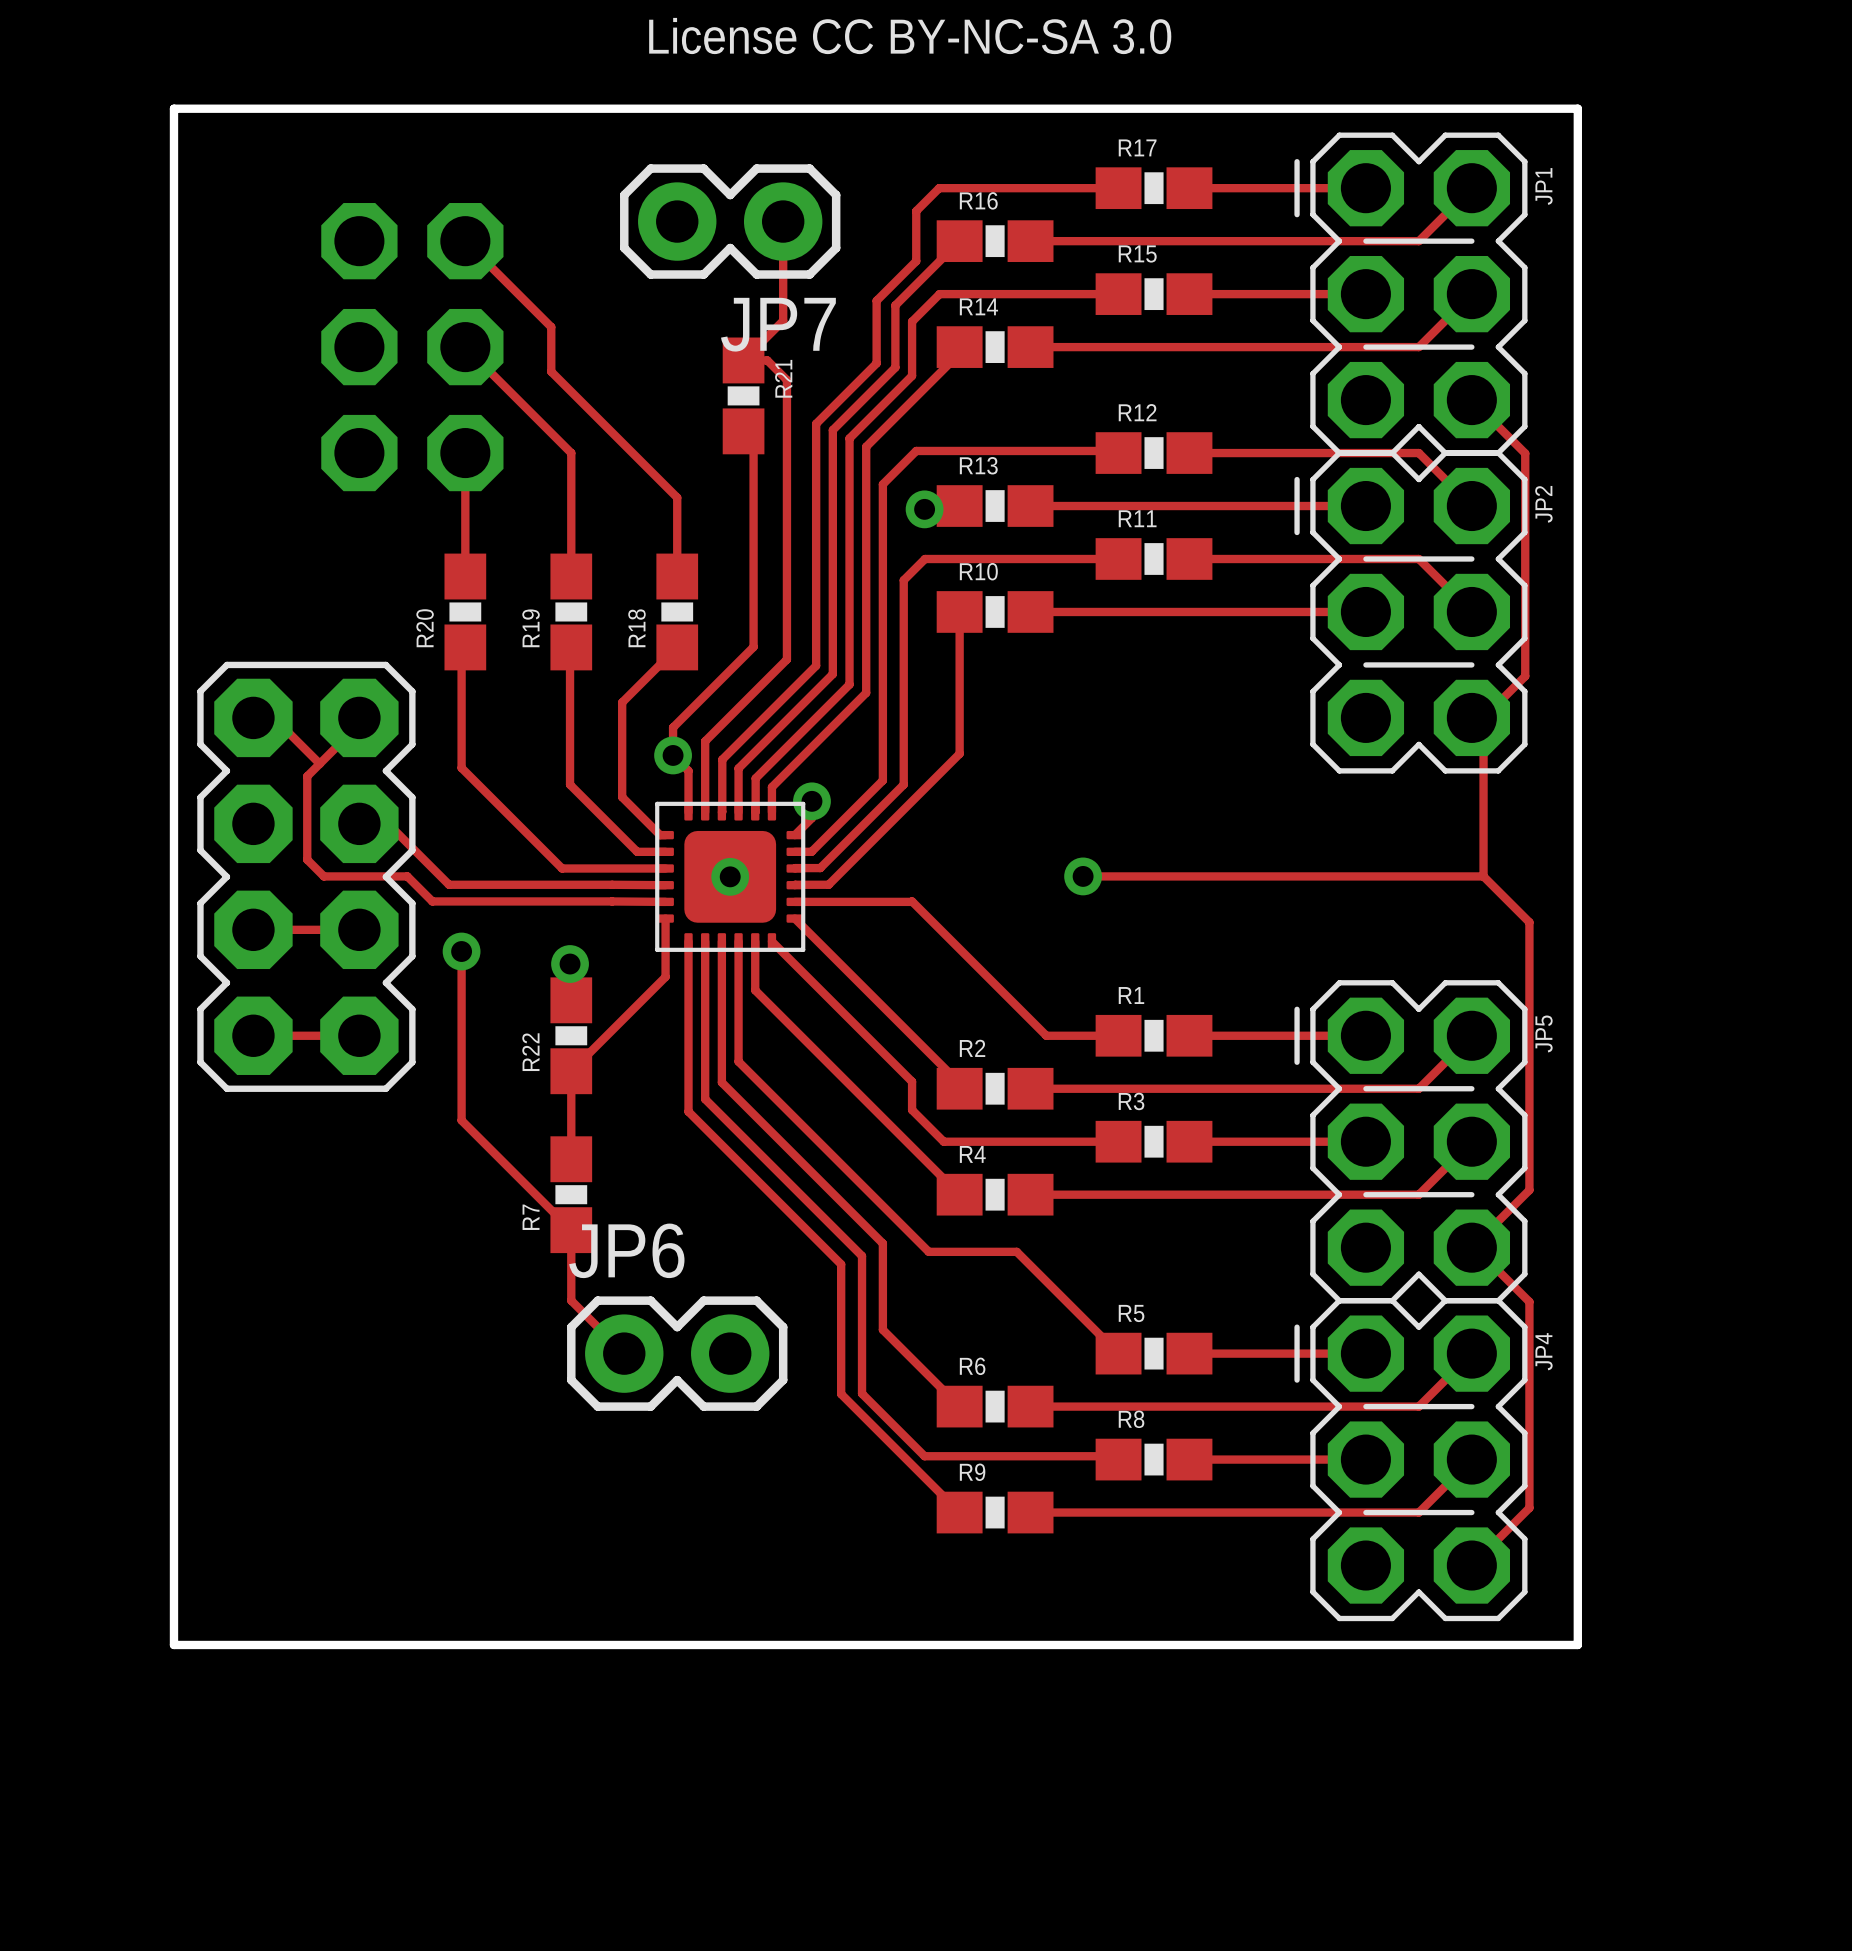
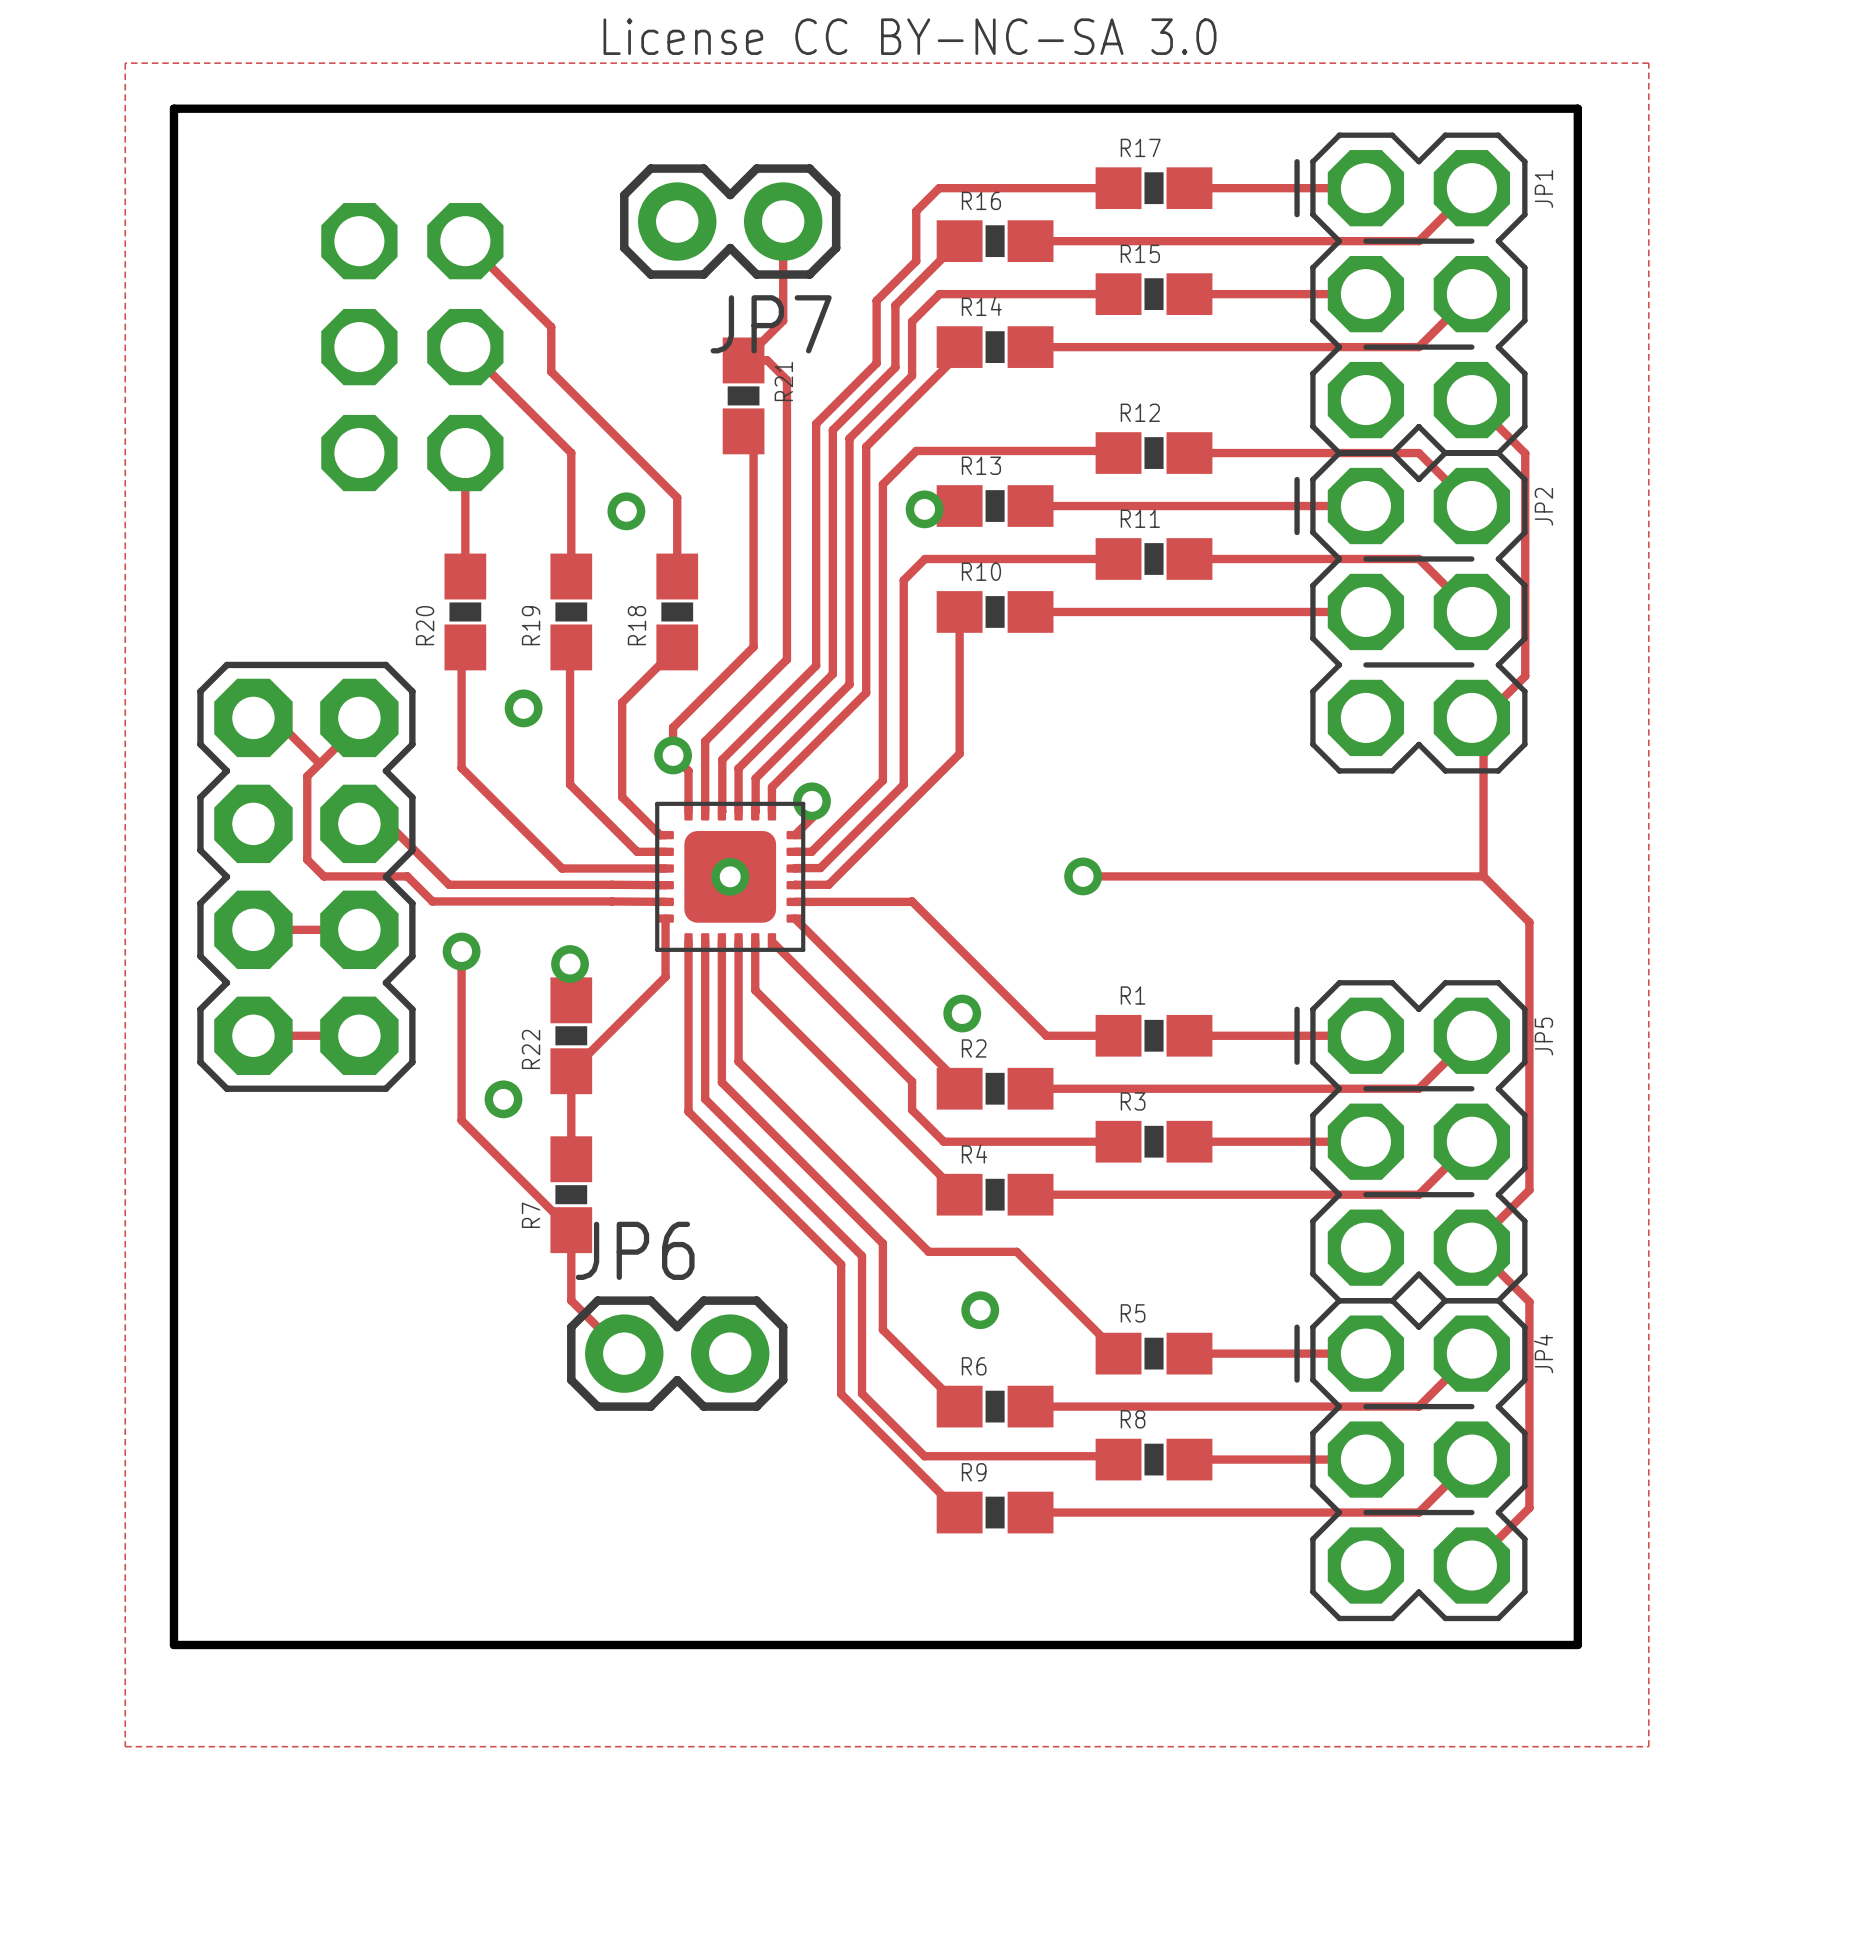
zone outline: none -> (125, 63) (1648, 63) (1648, 1746) (125, 1746) (125, 63)
via: none -> (626, 511)
via: none -> (523, 708)
via: none -> (962, 1013)
via: none -> (503, 1099)
via: none -> (980, 1310)

